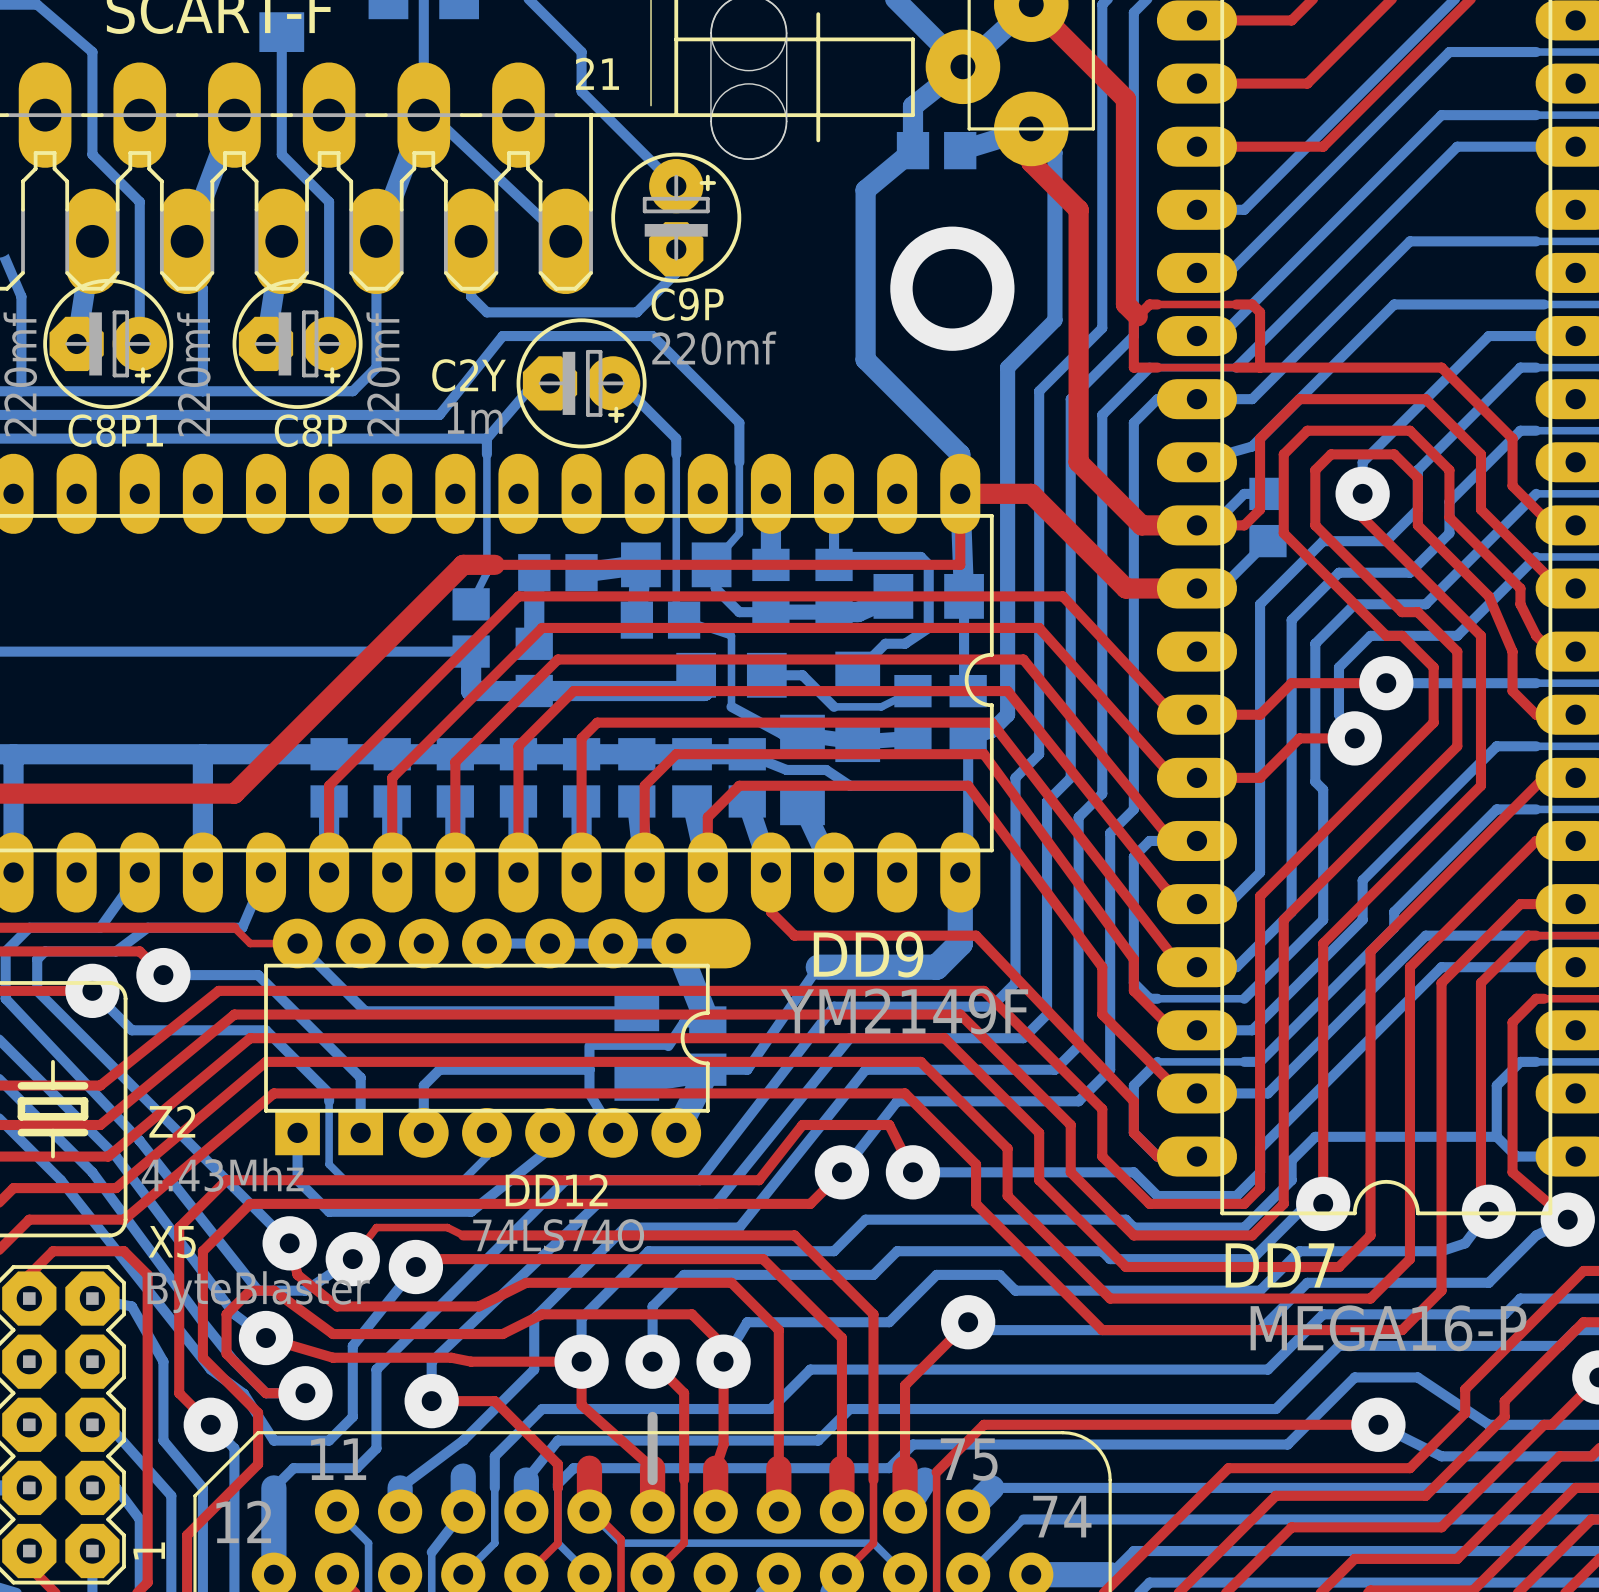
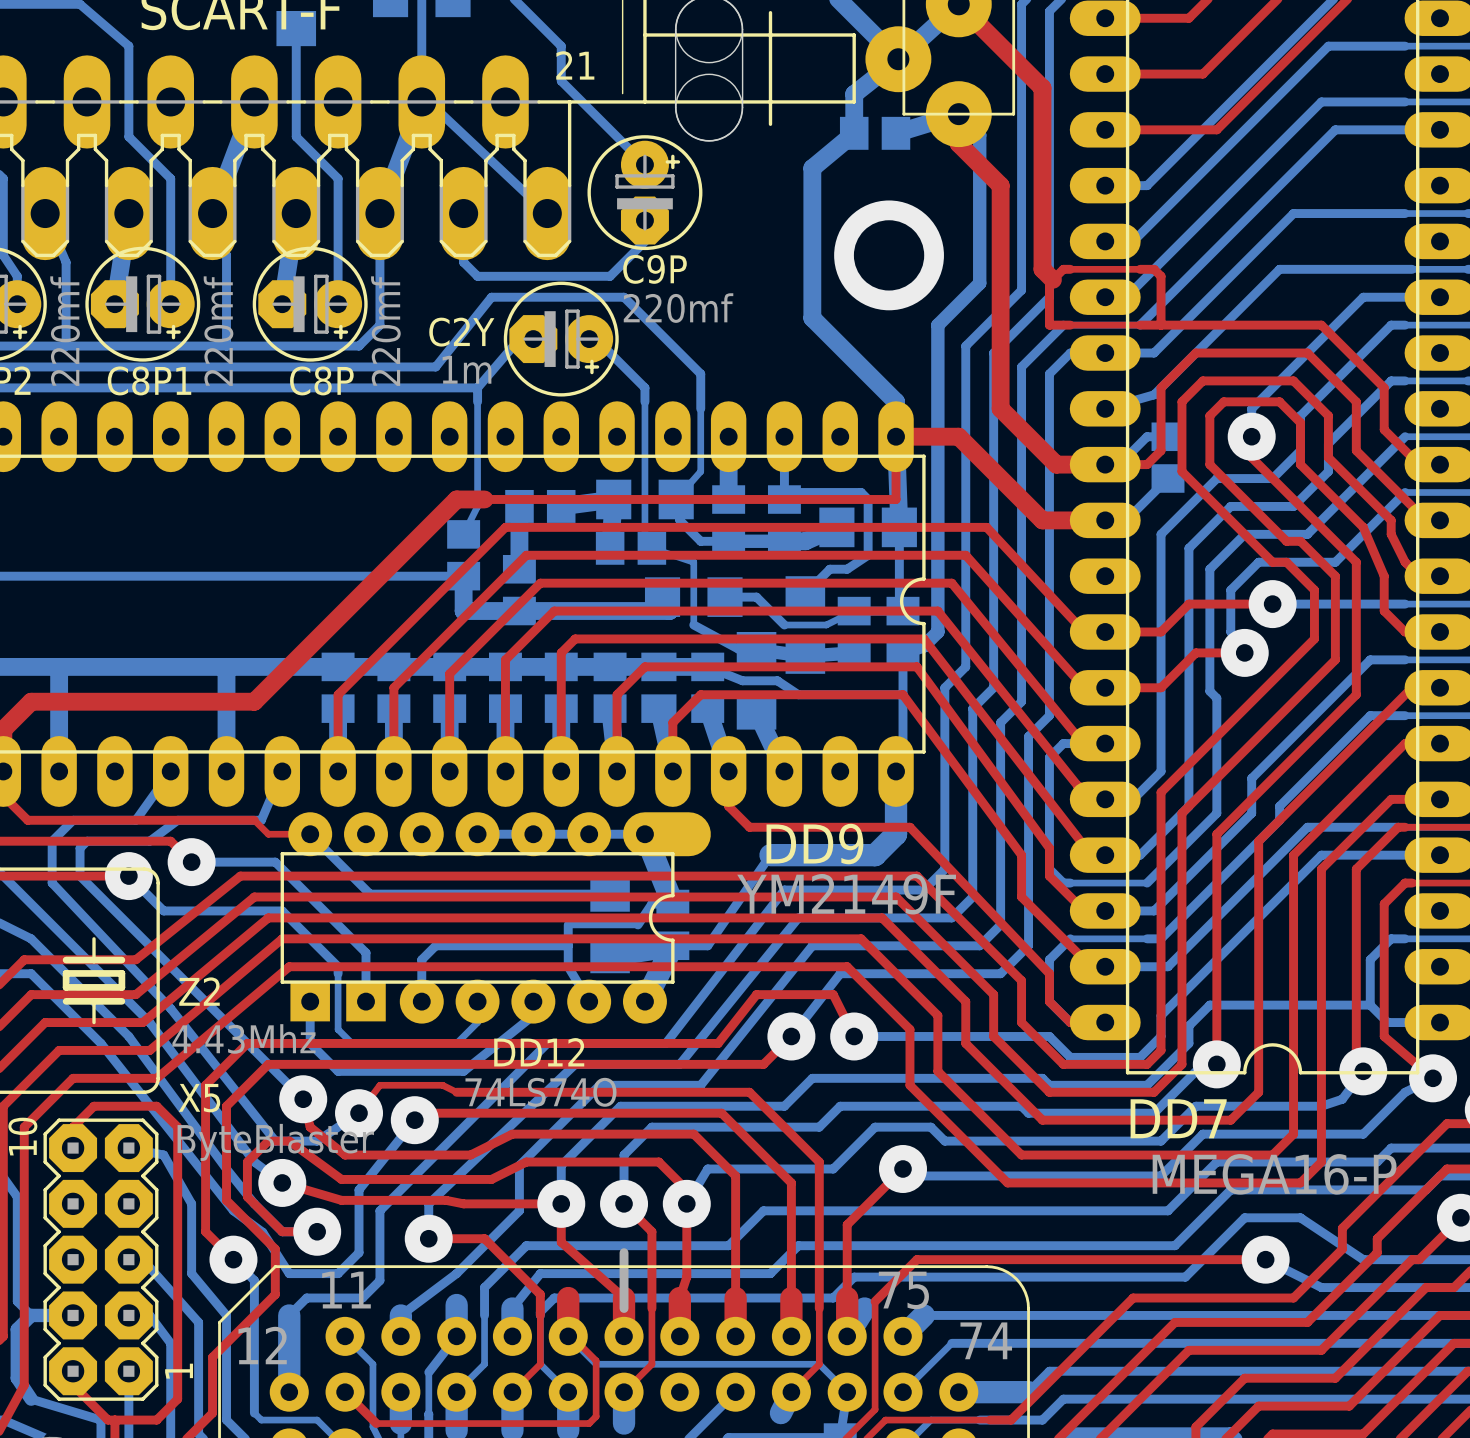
top track: (1007, 1196) (1110, 1298) (1370, 1298) (1409, 1259) -> (937, 1057) (937, 1071) (1021, 1155) (1272, 1155) (1293, 1134) (1293, 1113)
top track: (976, 1203) (1102, 1330) (1402, 1330) (1441, 1290) -> (909, 1064) (909, 1085) (1007, 1182) (1300, 1182) (1321, 1162) (1321, 1141)

